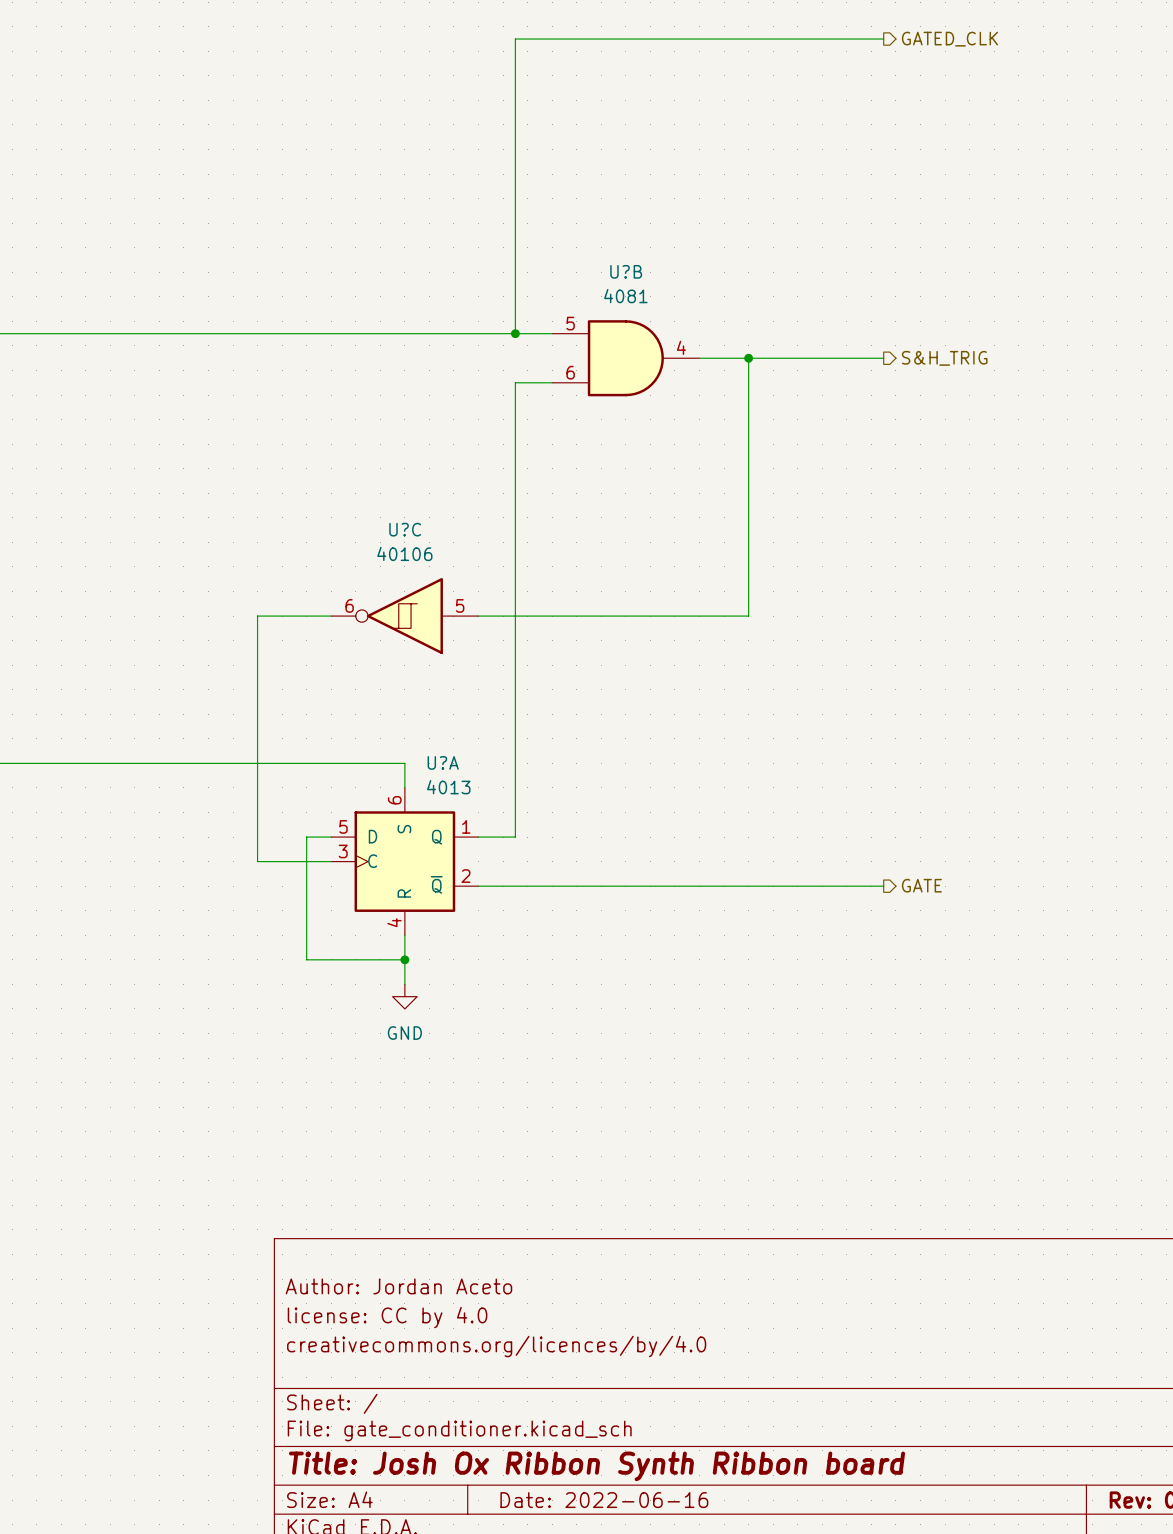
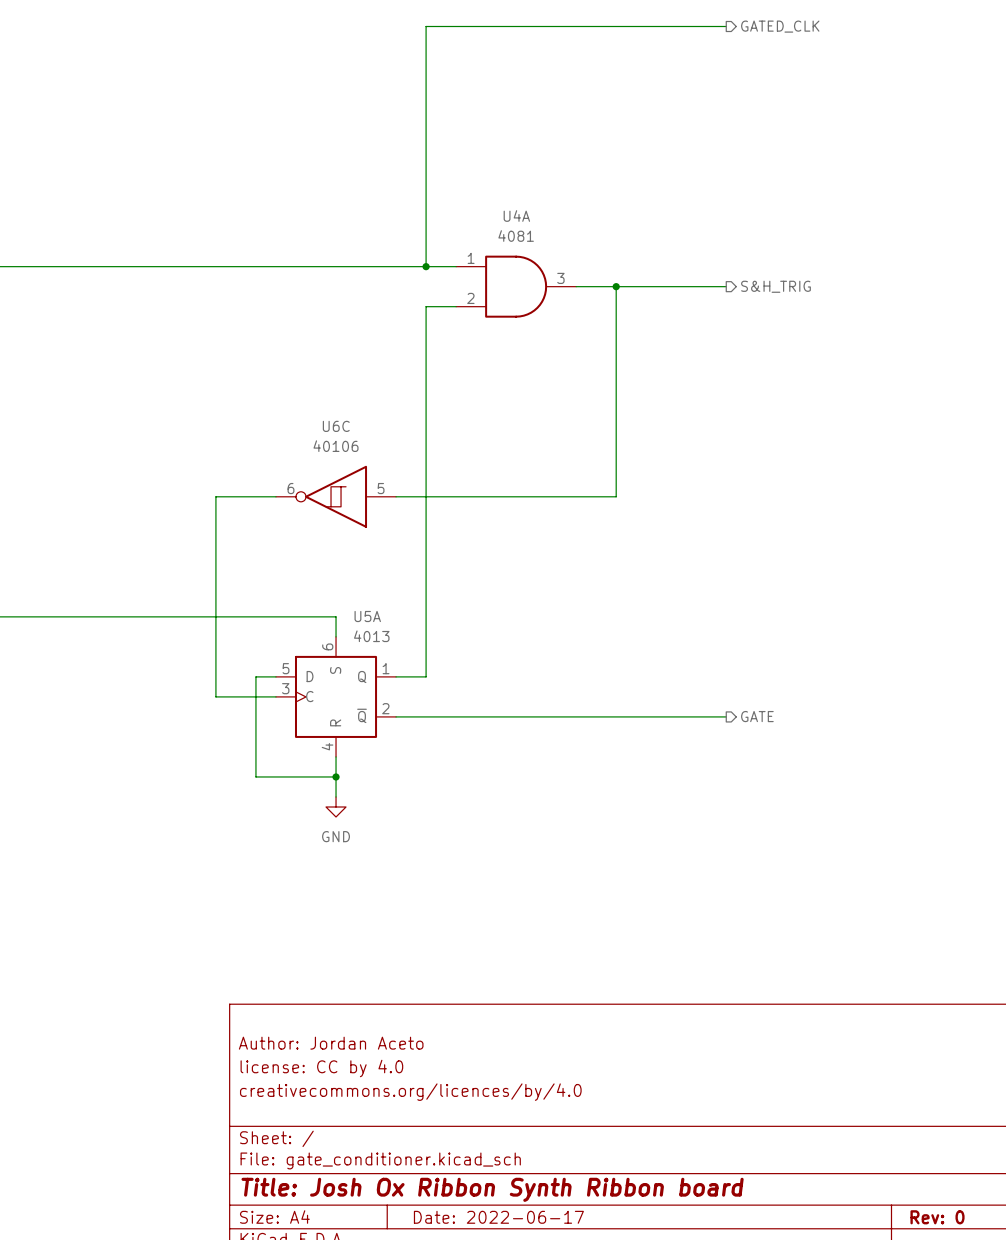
U?B name: U?B (626, 271) -> U4A (516, 216)
U?B pin number: 5 (570, 323) -> 1 (471, 258)
U?B pin number: 4 (681, 347) -> 3 (560, 278)
U?B pin number: 6 (570, 372) -> 2 (470, 298)
U?C name: U?C (405, 529) -> U6C (336, 426)
U?A name: U?A (443, 762) -> U5A (367, 616)
title block: Date: 2022-06-16 (604, 1500) -> Date: 2022-06-17 (498, 1217)

